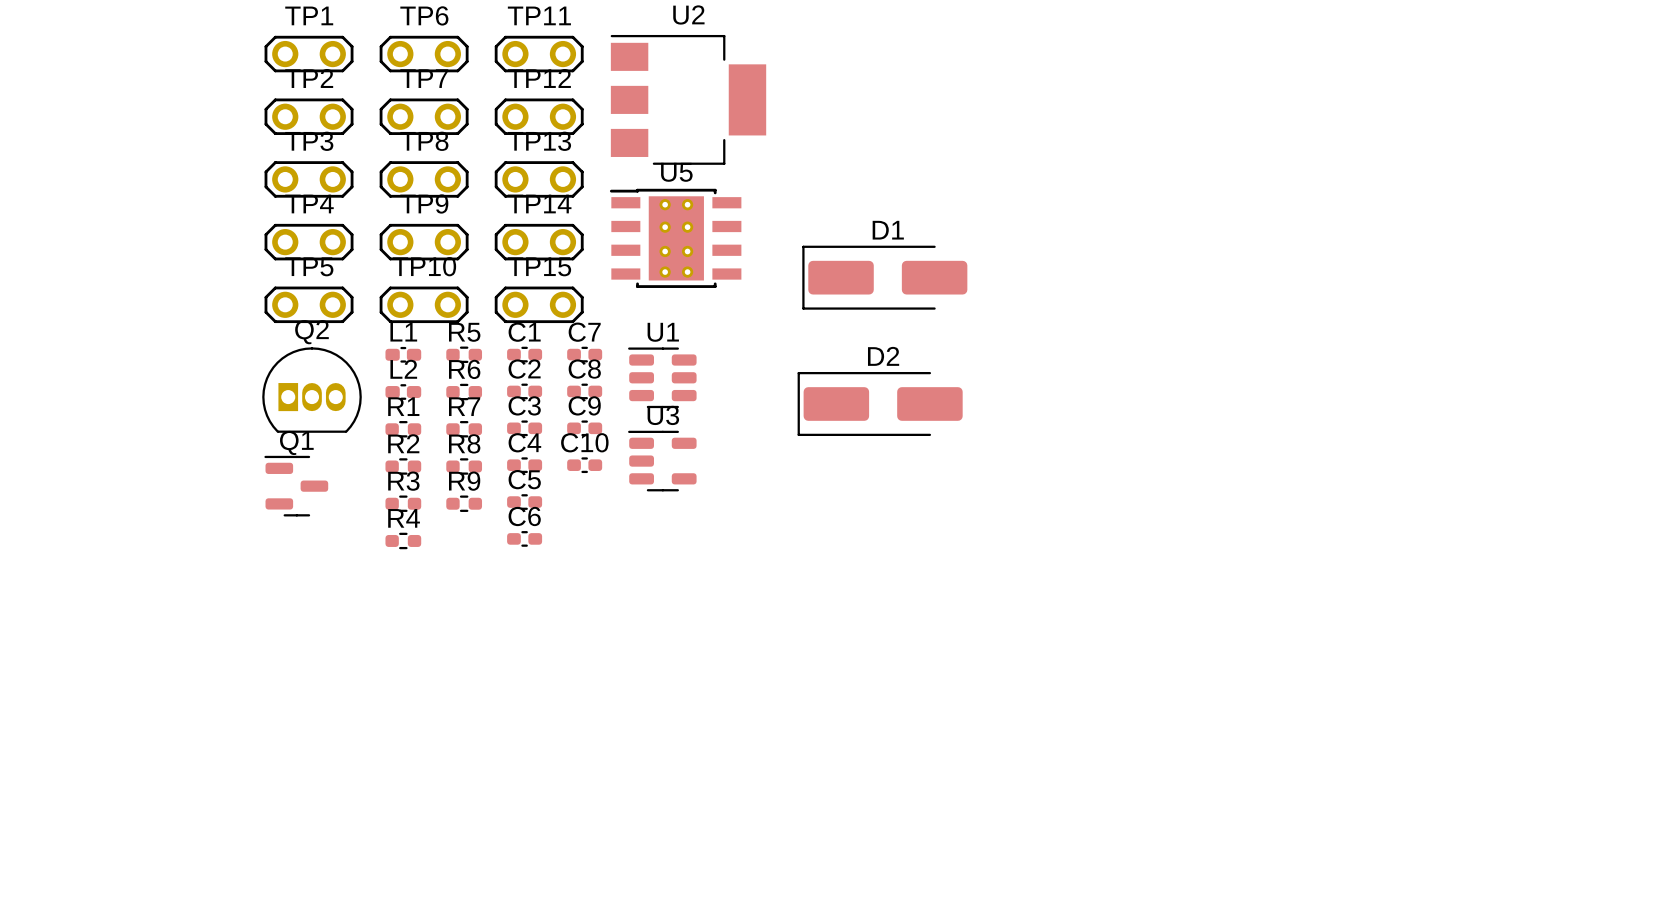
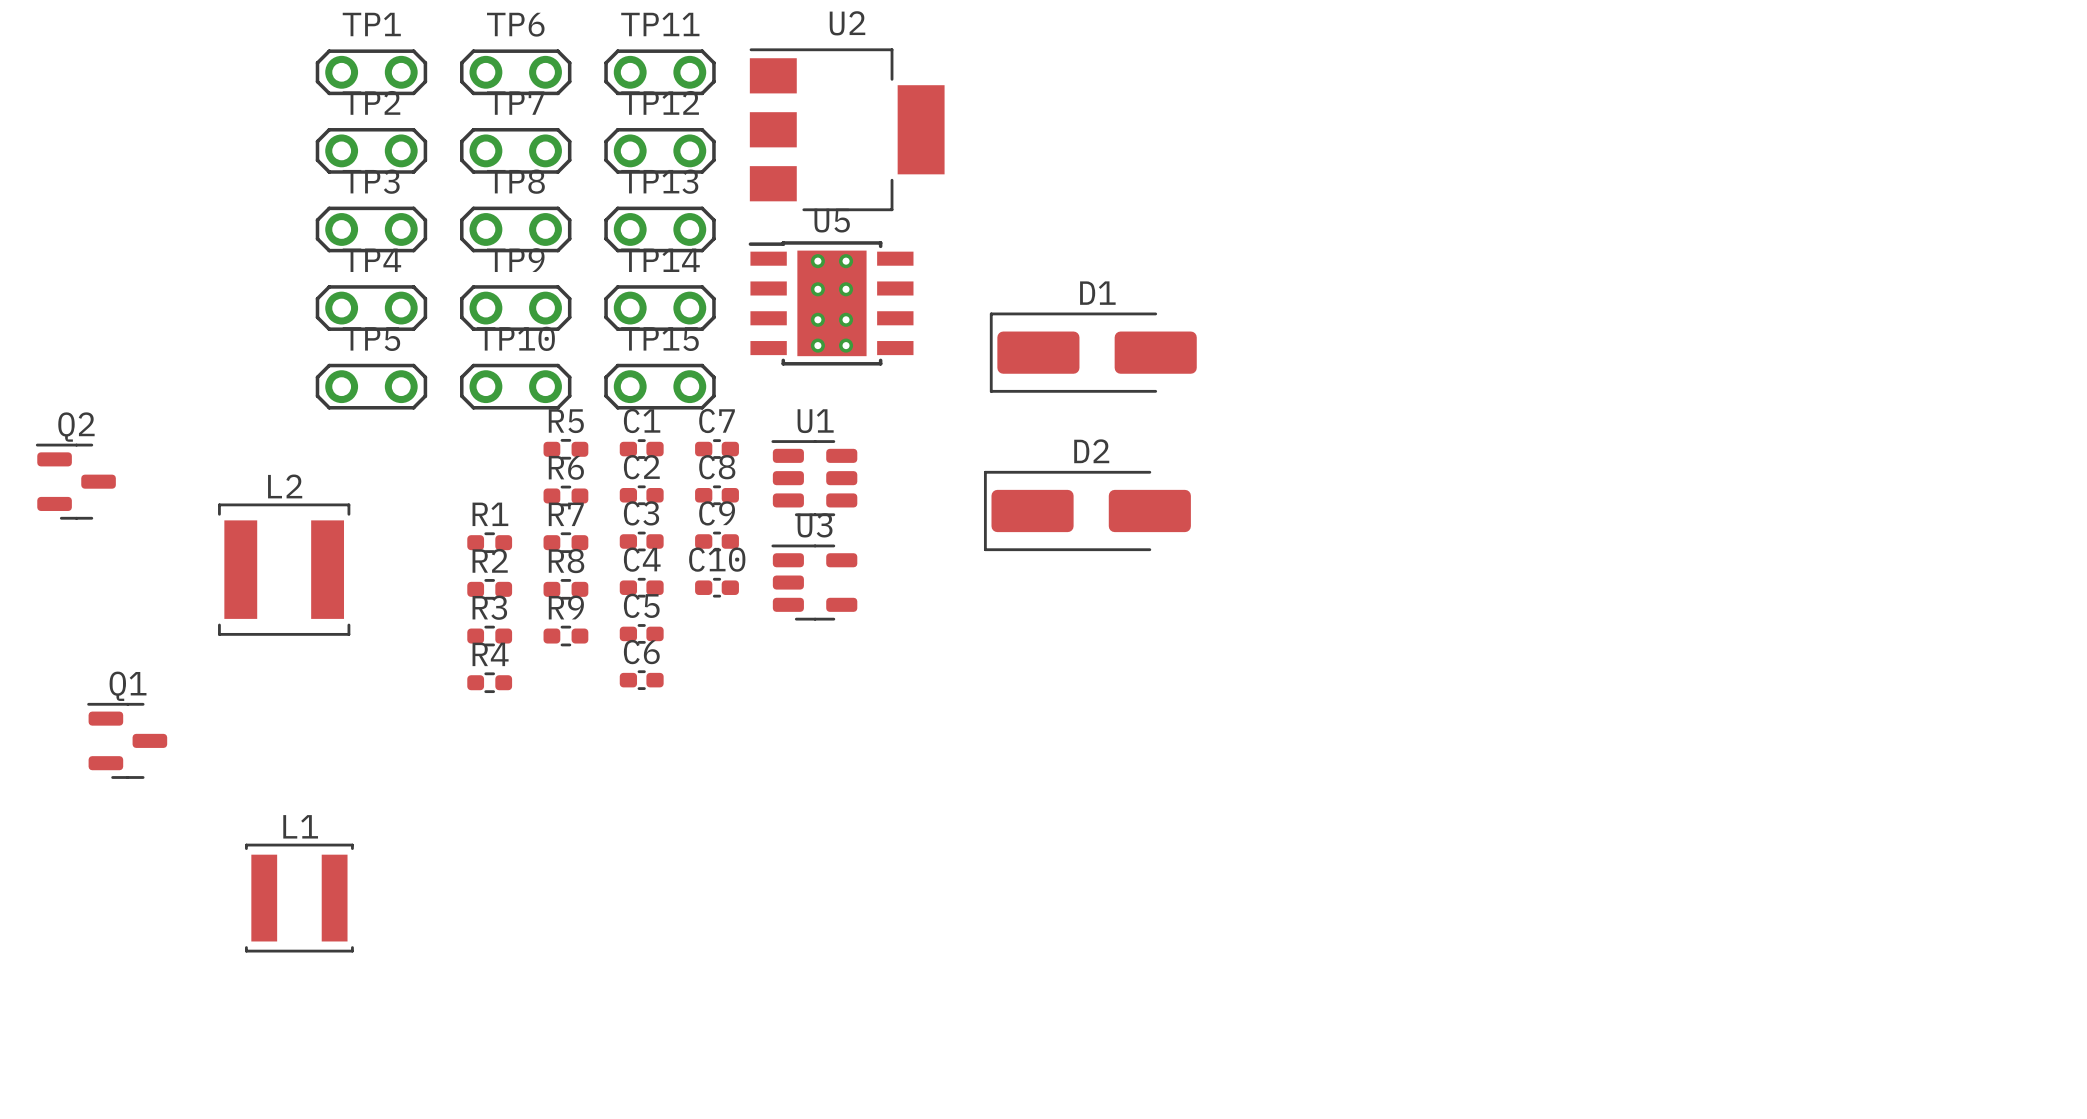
L1 footprint: [385, 346, 422, 363] -> [245, 843, 354, 953]
Q2 footprint: [262, 347, 362, 433] -> [35, 443, 116, 520]
L2 name position: L2 (403, 369) -> L2 (285, 486)
L2 footprint: [385, 384, 422, 400] -> [218, 503, 351, 636]
Q1 position: (296, 486) -> (127, 740)

